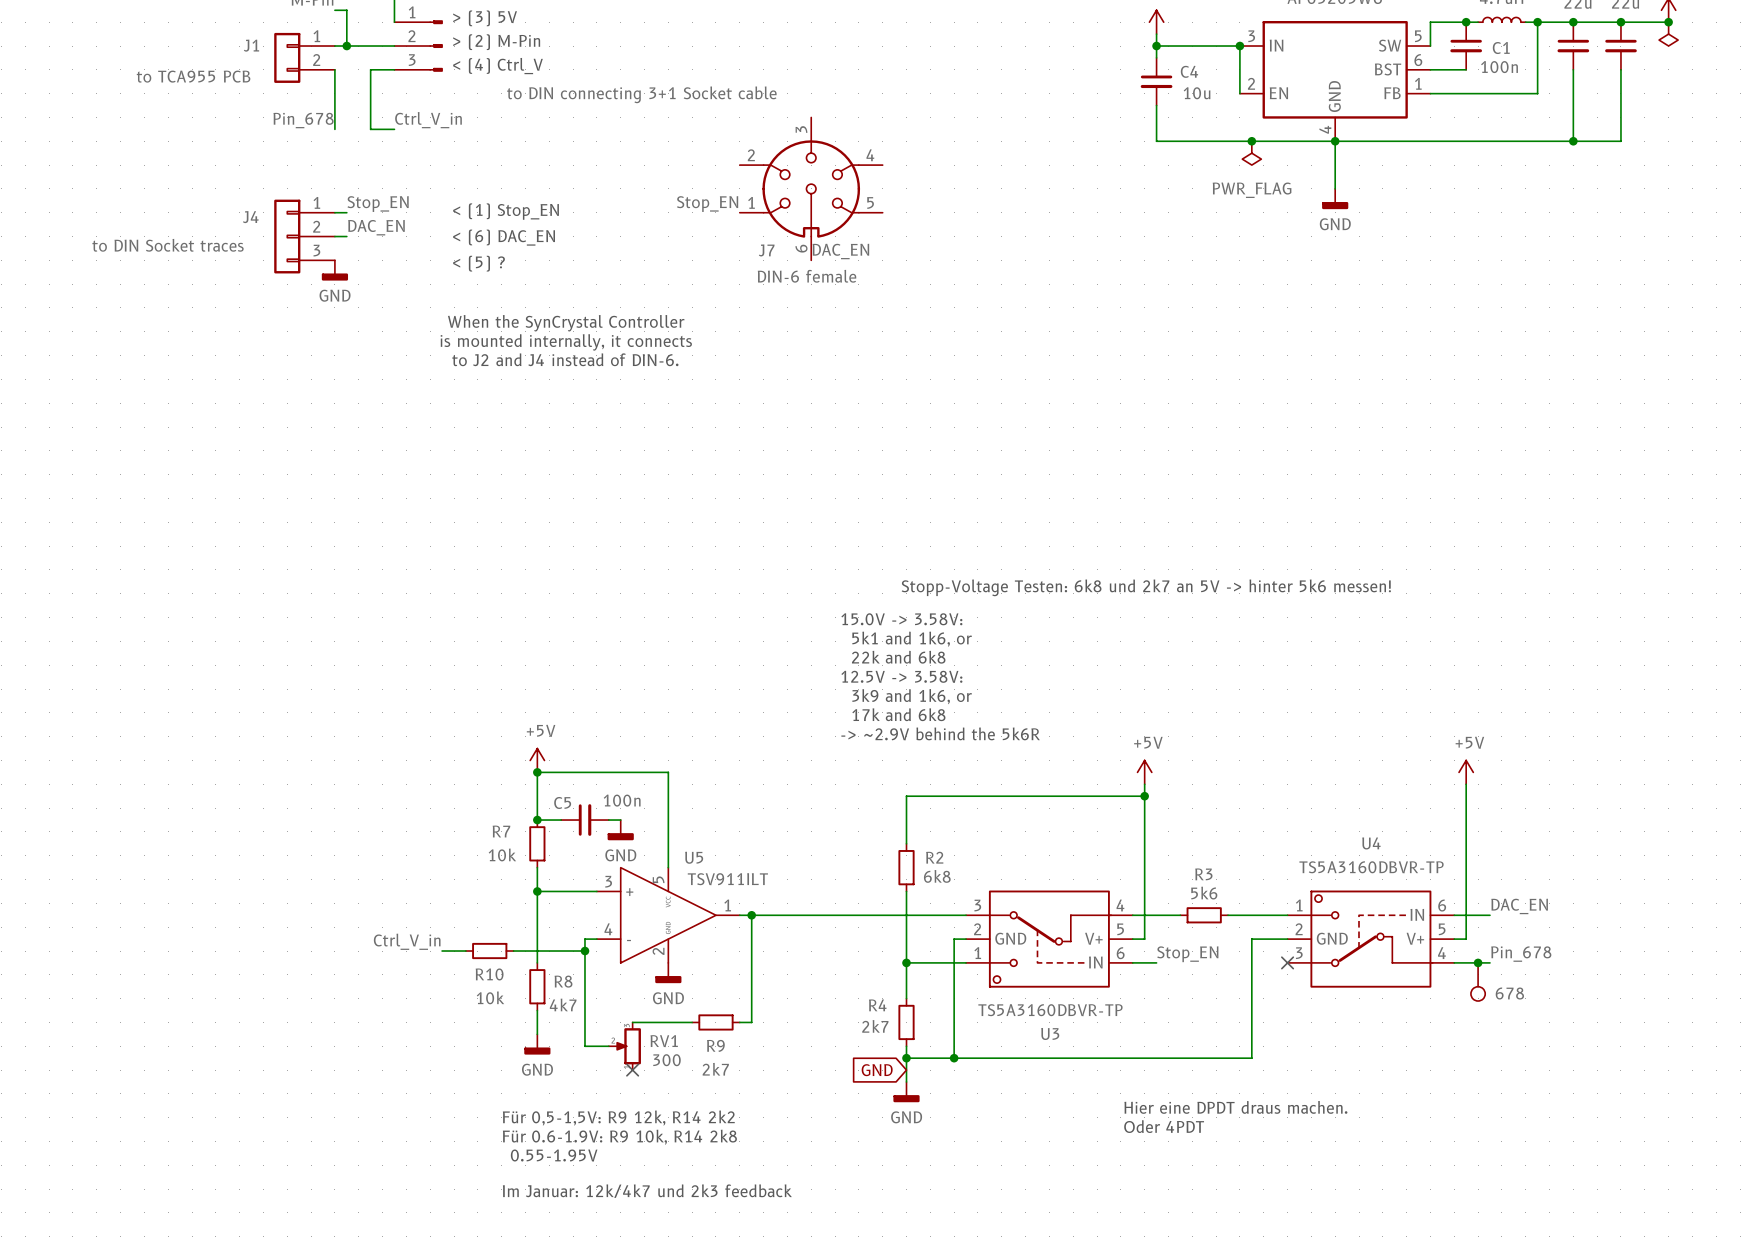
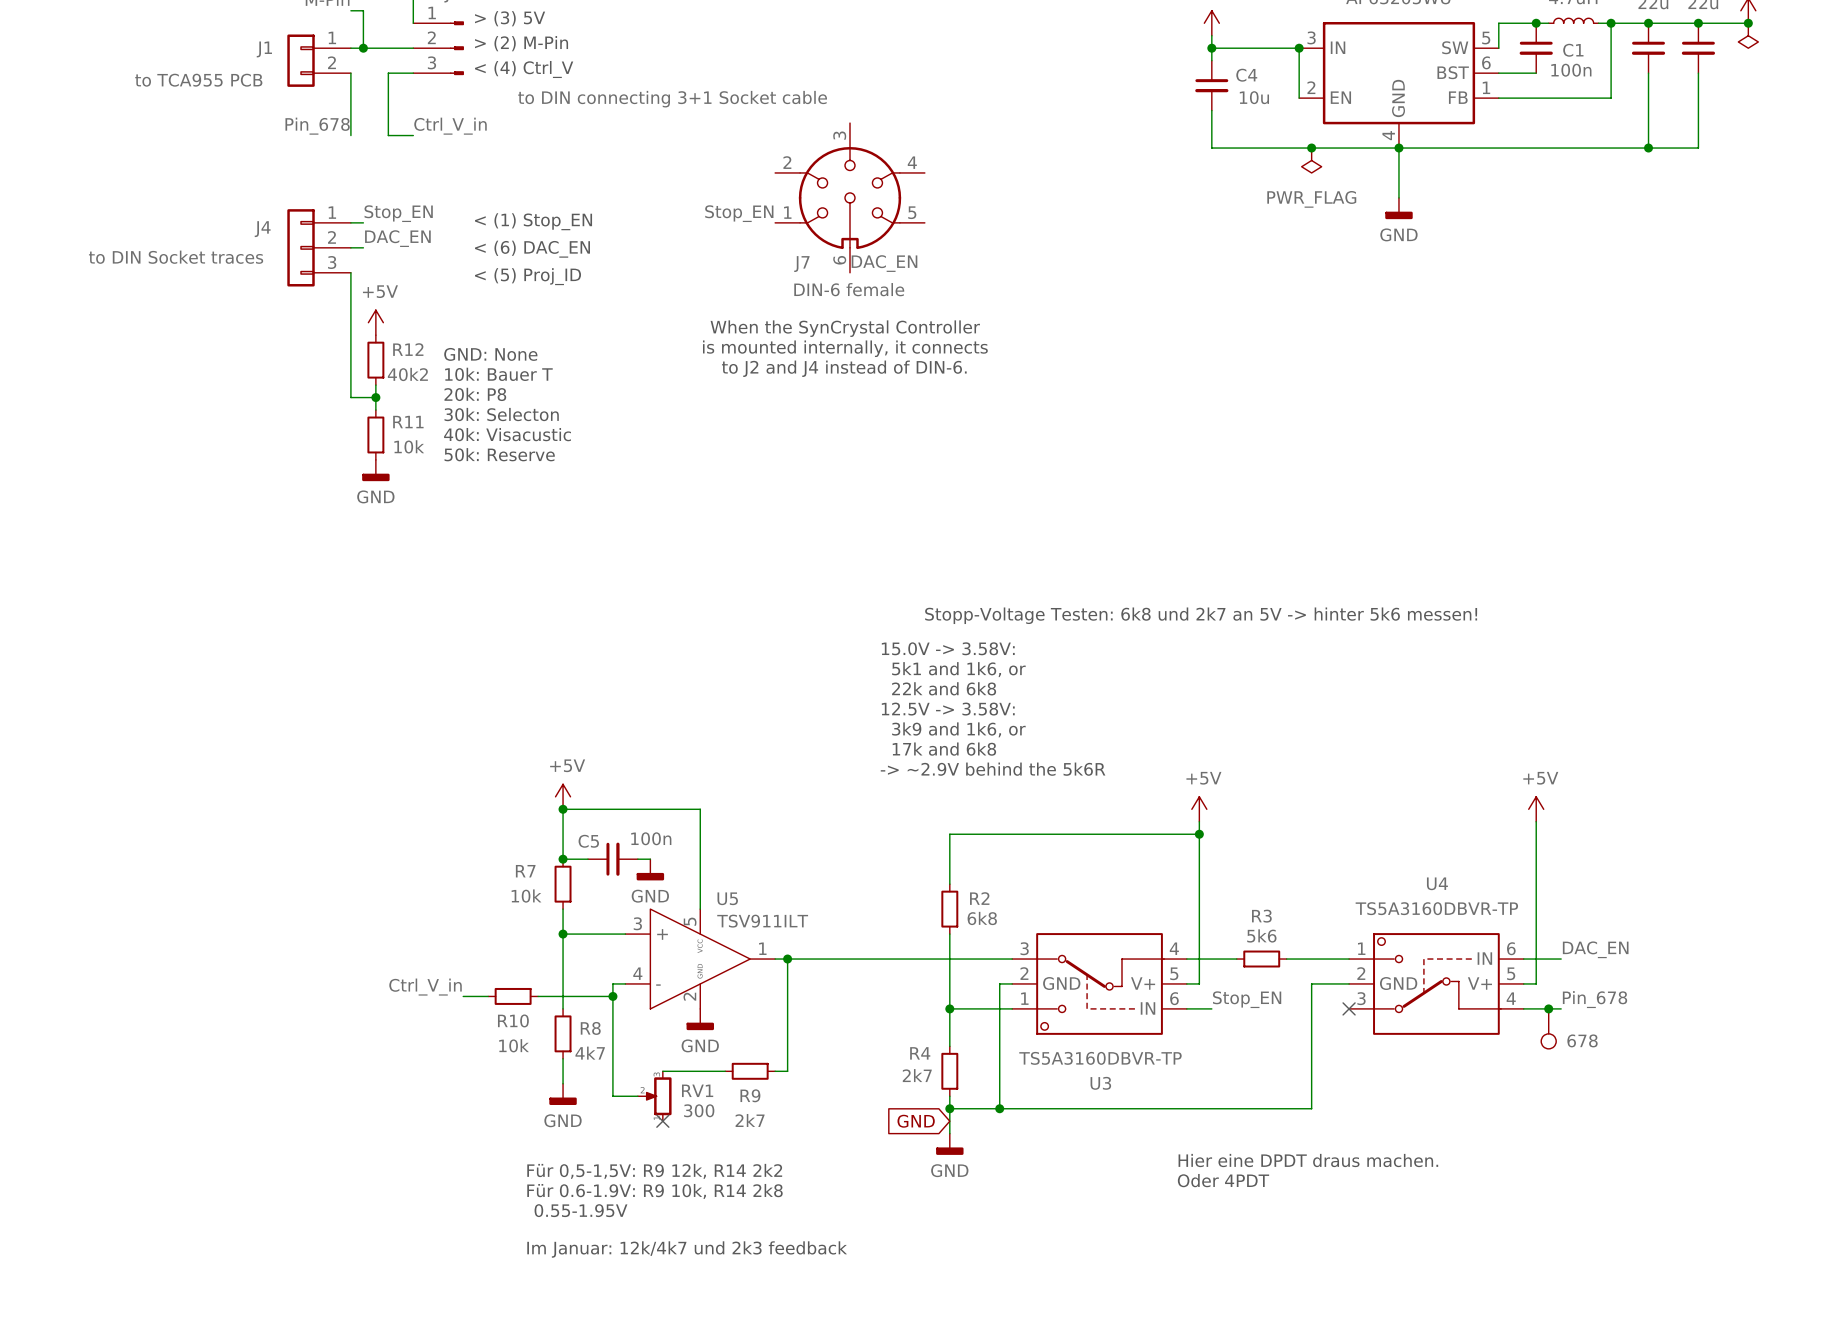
wire: none -> (350, 272) (350, 397) (375, 397)
text: < (5) ? (479, 263) -> < (5) Proj_ID (528, 276)
power symbol position: GND (334, 270) -> GND (375, 470)
power symbol: none -> +5V (375, 322)
text: none -> When the SynCrystal Controller (845, 328)
text: When the SynCrystal Controller (566, 323) -> none
text: none -> is mounted internally, it connects (845, 348)
text: none -> GND: None (490, 354)
text: is mounted internally, it connects (566, 342) -> none
R12: none -> 40k2 (375, 360)
text: none -> to J2 and J4 instead of DIN-6. (844, 368)
text: none -> 10k: Bauer T (498, 374)
text: to J2 and J4 instead of DIN-6. (565, 359) -> none
wire: none -> (375, 385) (375, 410)
text: none -> 20k: P8 (475, 394)
junction: none -> (375, 397)
text: none -> 30k: Selecton (501, 414)
text: none -> 40k: Visacustic (507, 434)
R11: none -> 10k (375, 434)
text: none -> 50k: Reserve (499, 454)

